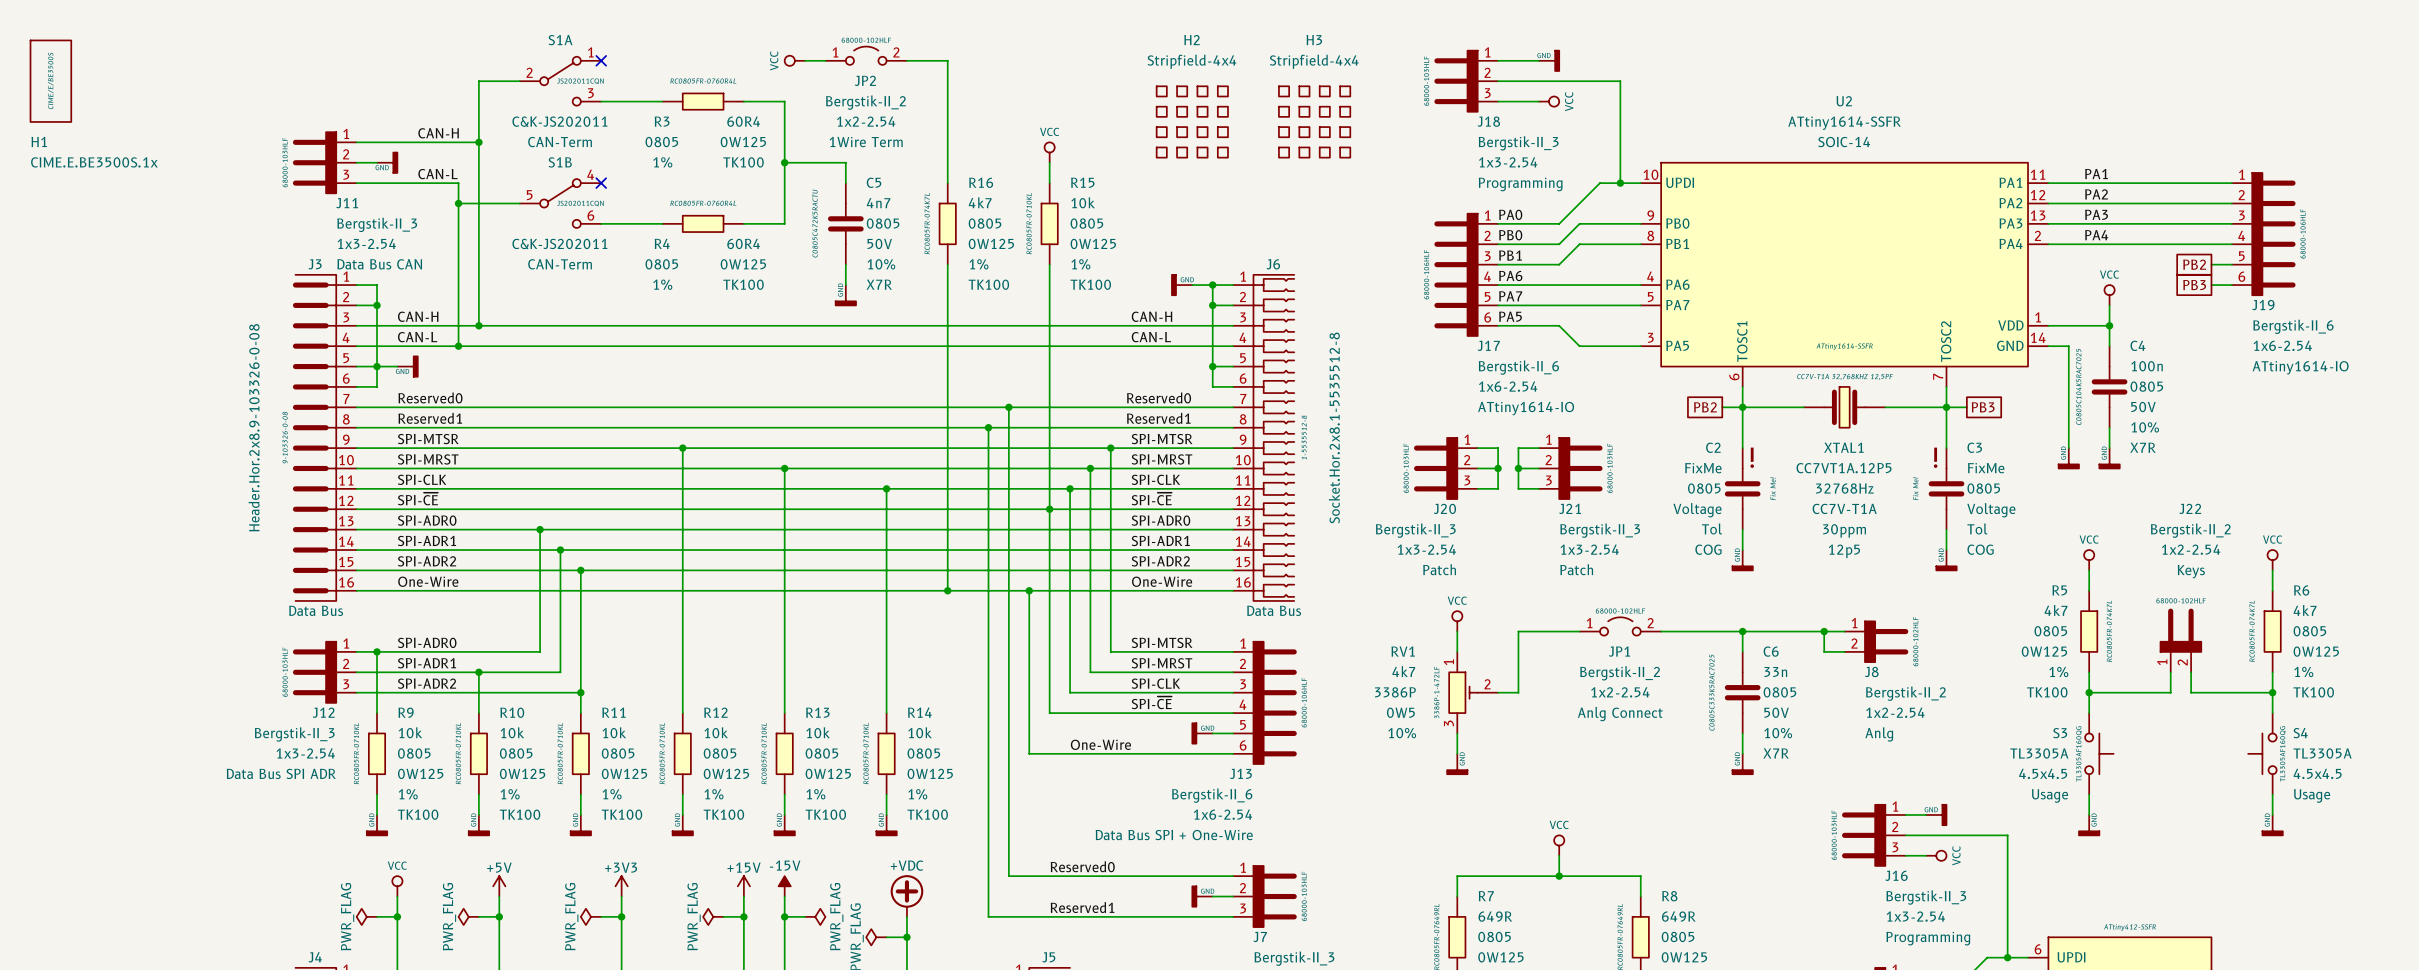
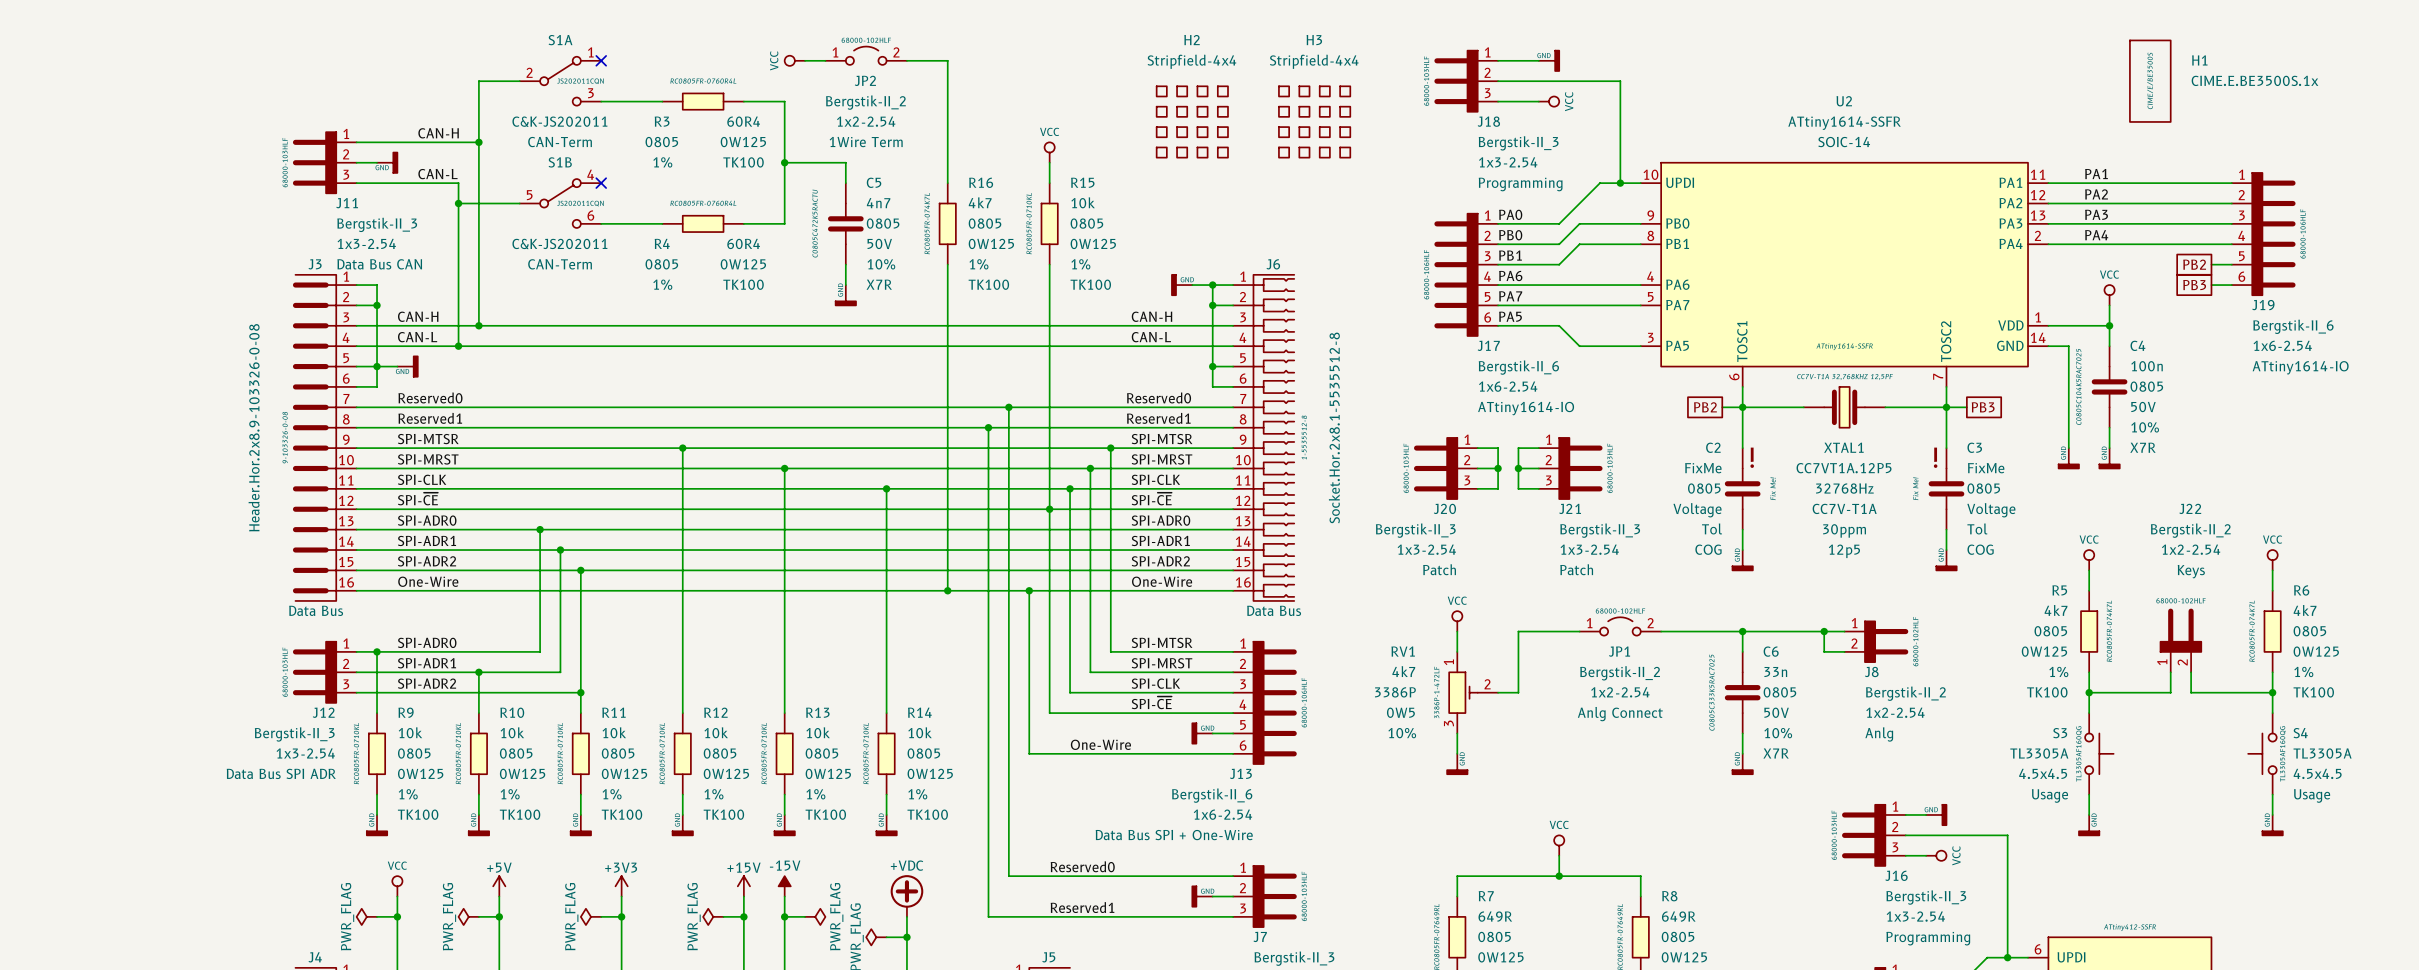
H1 position: (50, 81) -> (2150, 81)
H1 name position: H1 (39, 141) -> H1 (2199, 60)
H1 value position: CIME.E.BE3500S.1x (94, 162) -> CIME.E.BE3500S.1x (2255, 80)

